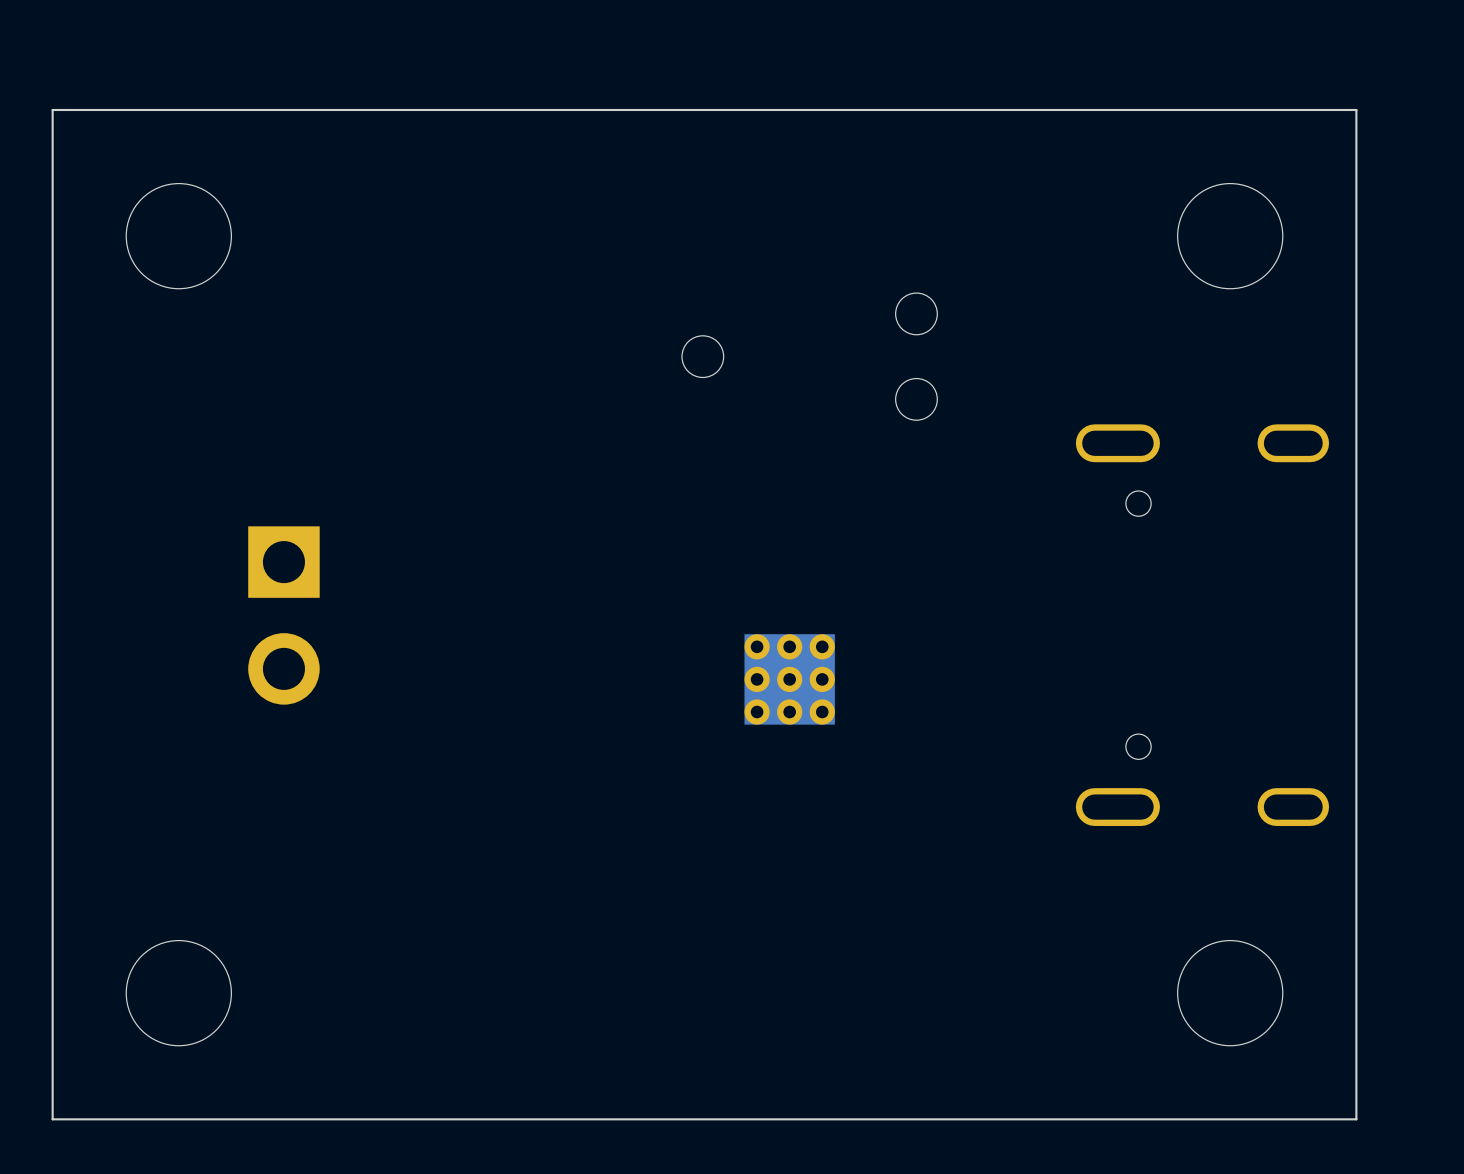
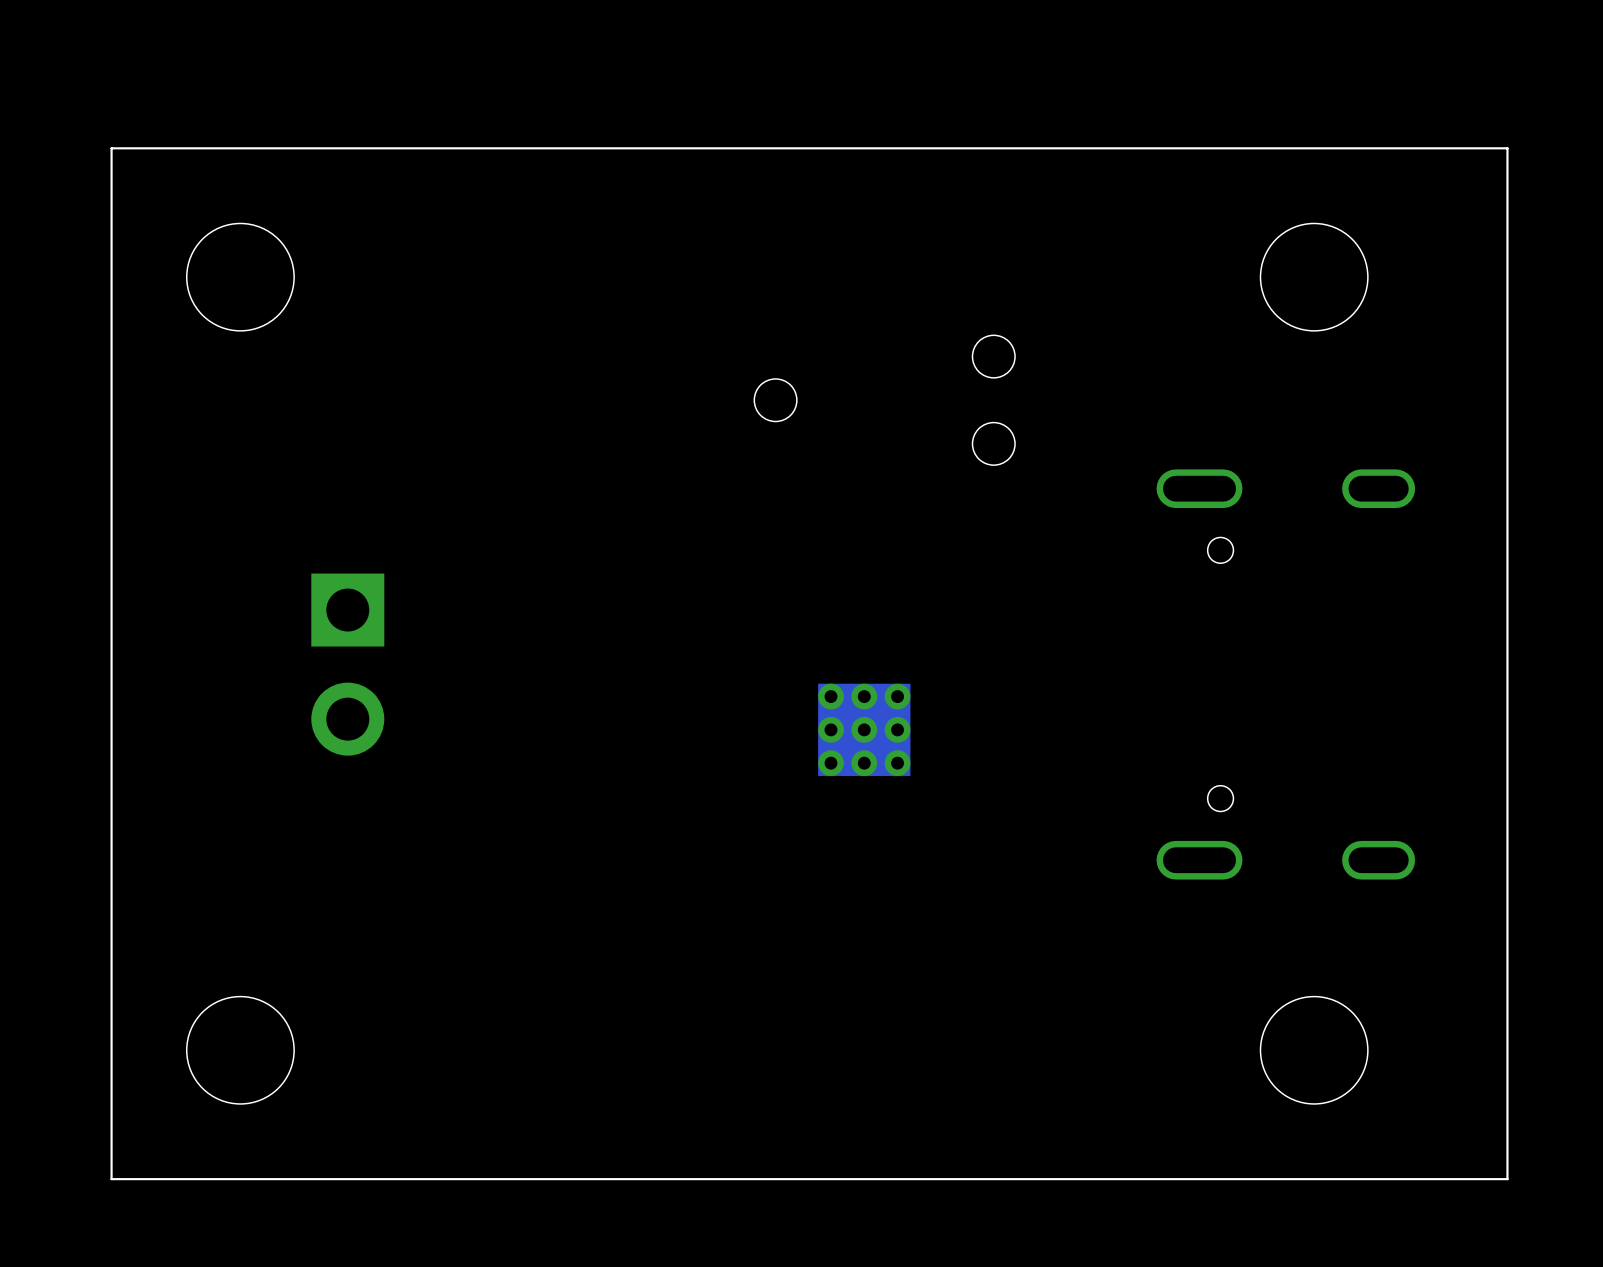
board edge: (1356, 109) (1356, 1119) -> (1443, 148) (1507, 148) (1507, 1179) (1443, 1179)

